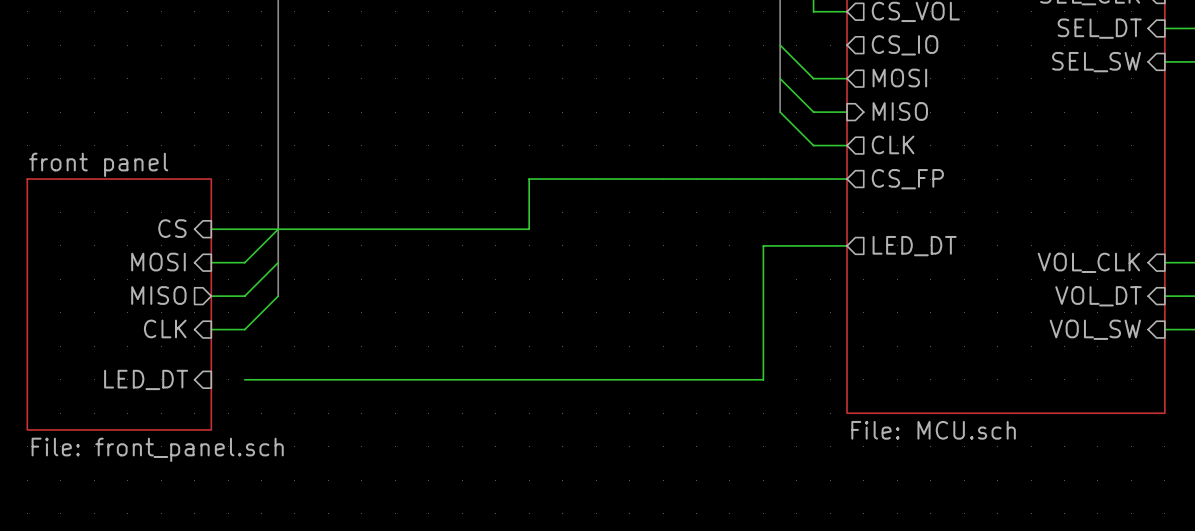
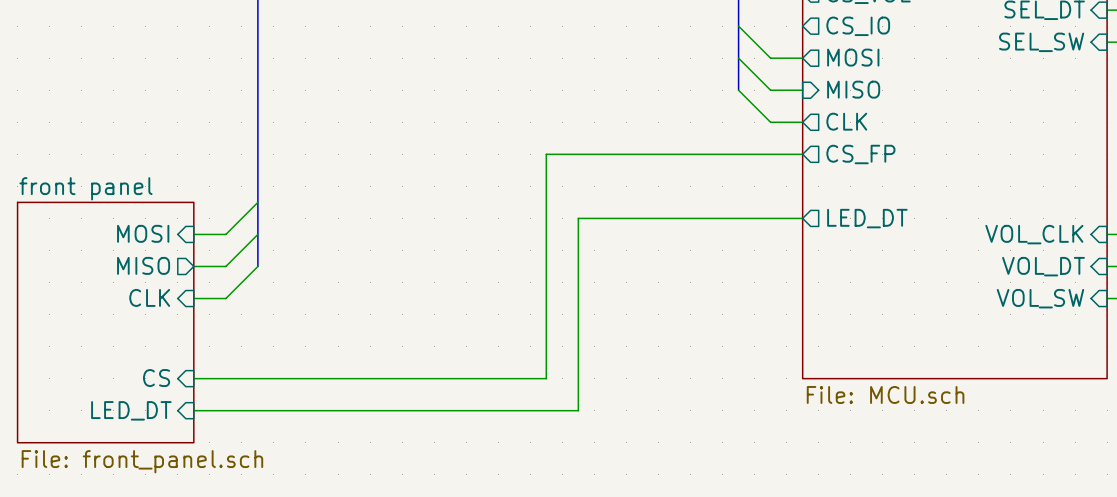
wire: (579, 179) (529, 179) (529, 229) (211, 229) -> (546, 154) (546, 378) (193, 378)
sheet pin position: CS (172, 228) -> CS (156, 378)
wire: (763, 245) (763, 379) (244, 379) -> (722, 218) (578, 218) (578, 410) (193, 410)
sheet front panel position: (119, 304) -> (105, 322)
sheet pin position: LED_DT (146, 379) -> LED_DT (131, 410)

